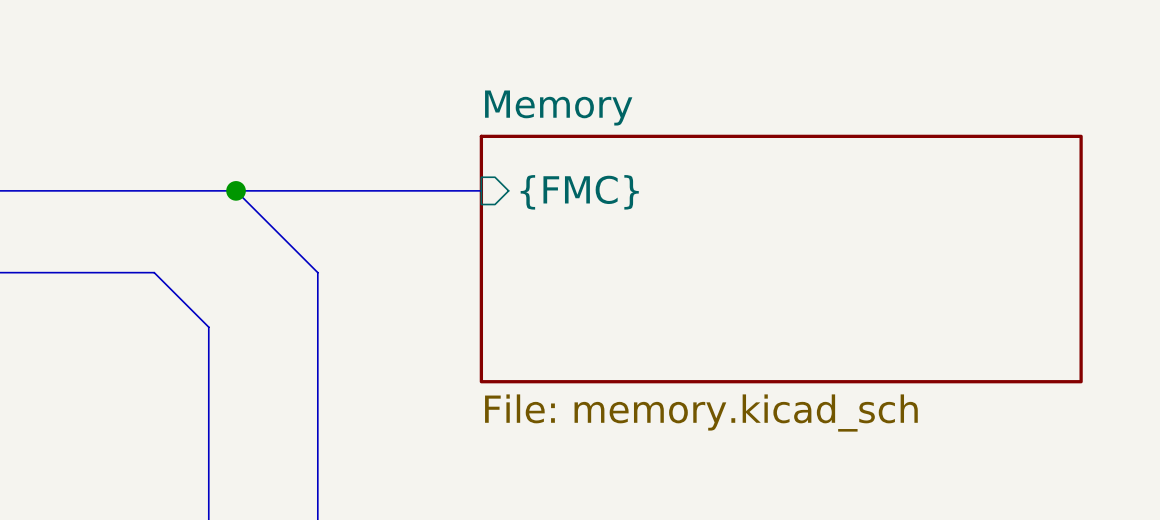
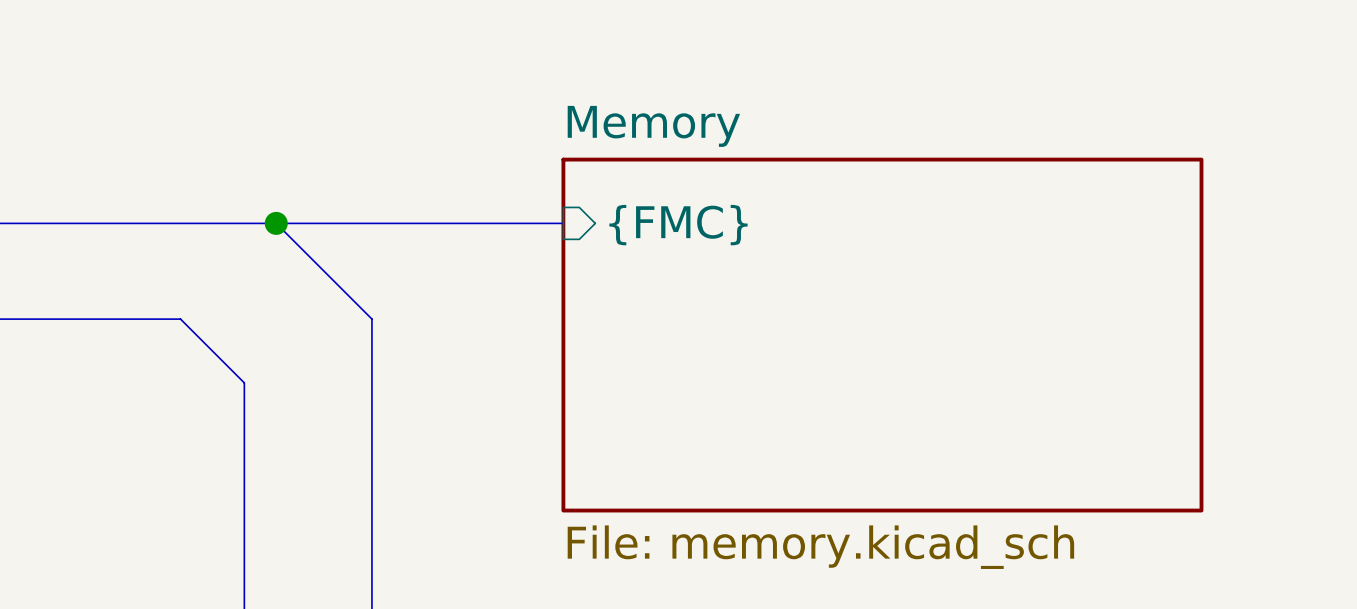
sheet Memory: File: memory.kicad_sch (781, 259) -> none
sheet Memory: none -> File: memory.kicad_sch (882, 335)

